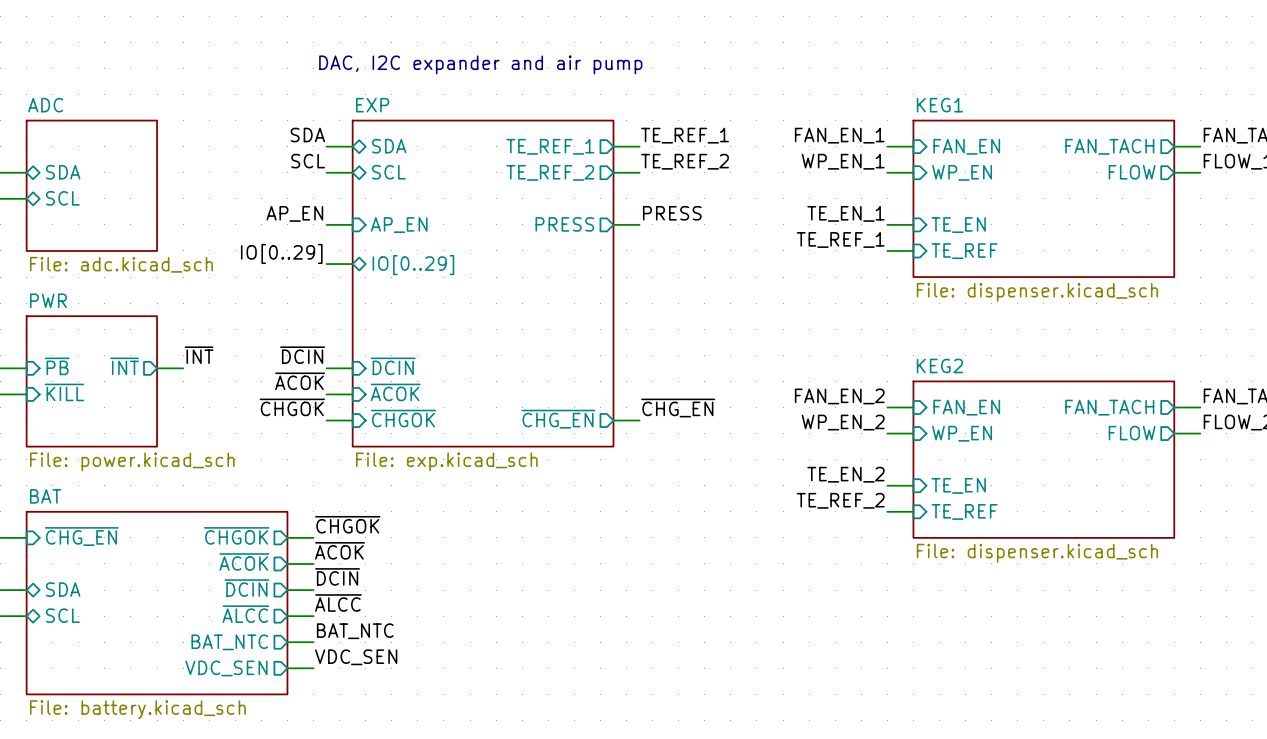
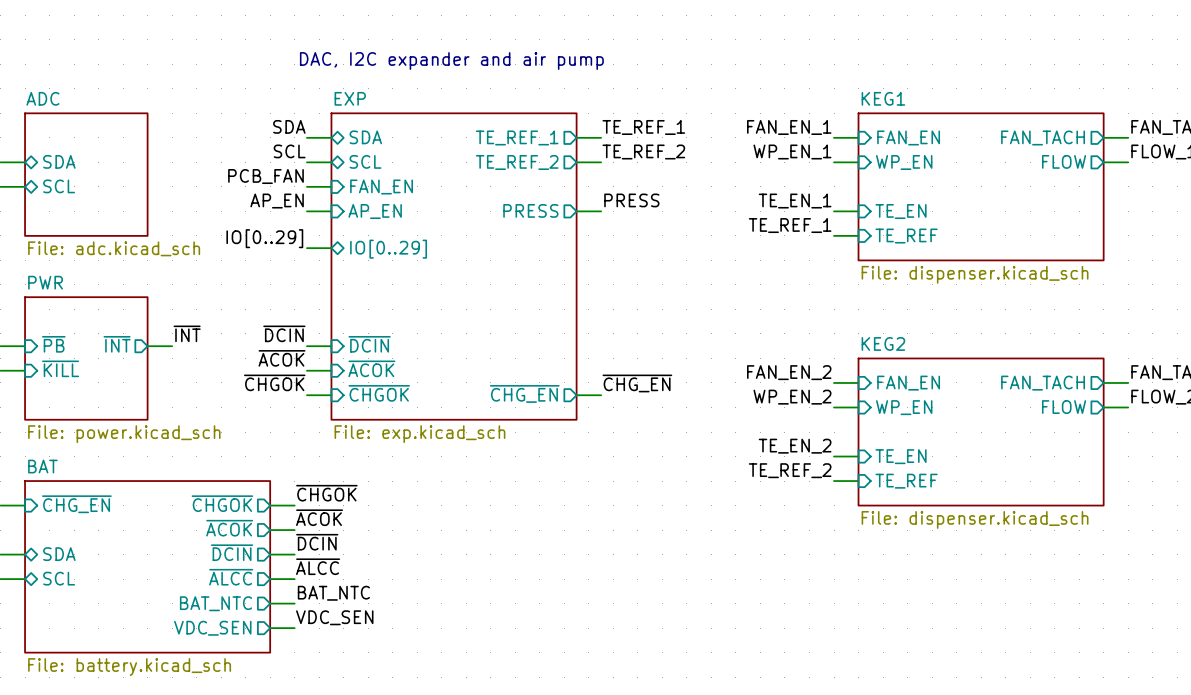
label: none -> PCB_FAN (265, 176)
wire: none -> (306, 186) (331, 186)
sheet pin: none -> FAN_EN (381, 186)

